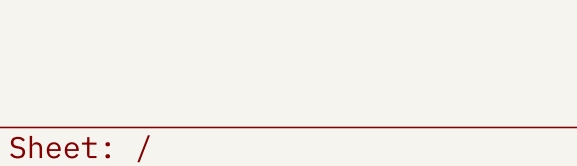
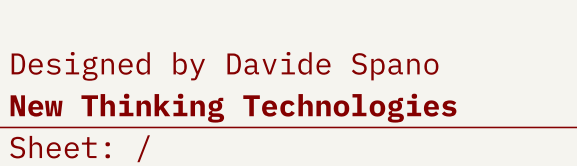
title block: none -> Designed by Davide Spano (225, 66)
title block: none -> New Thinking Technologies (233, 108)

